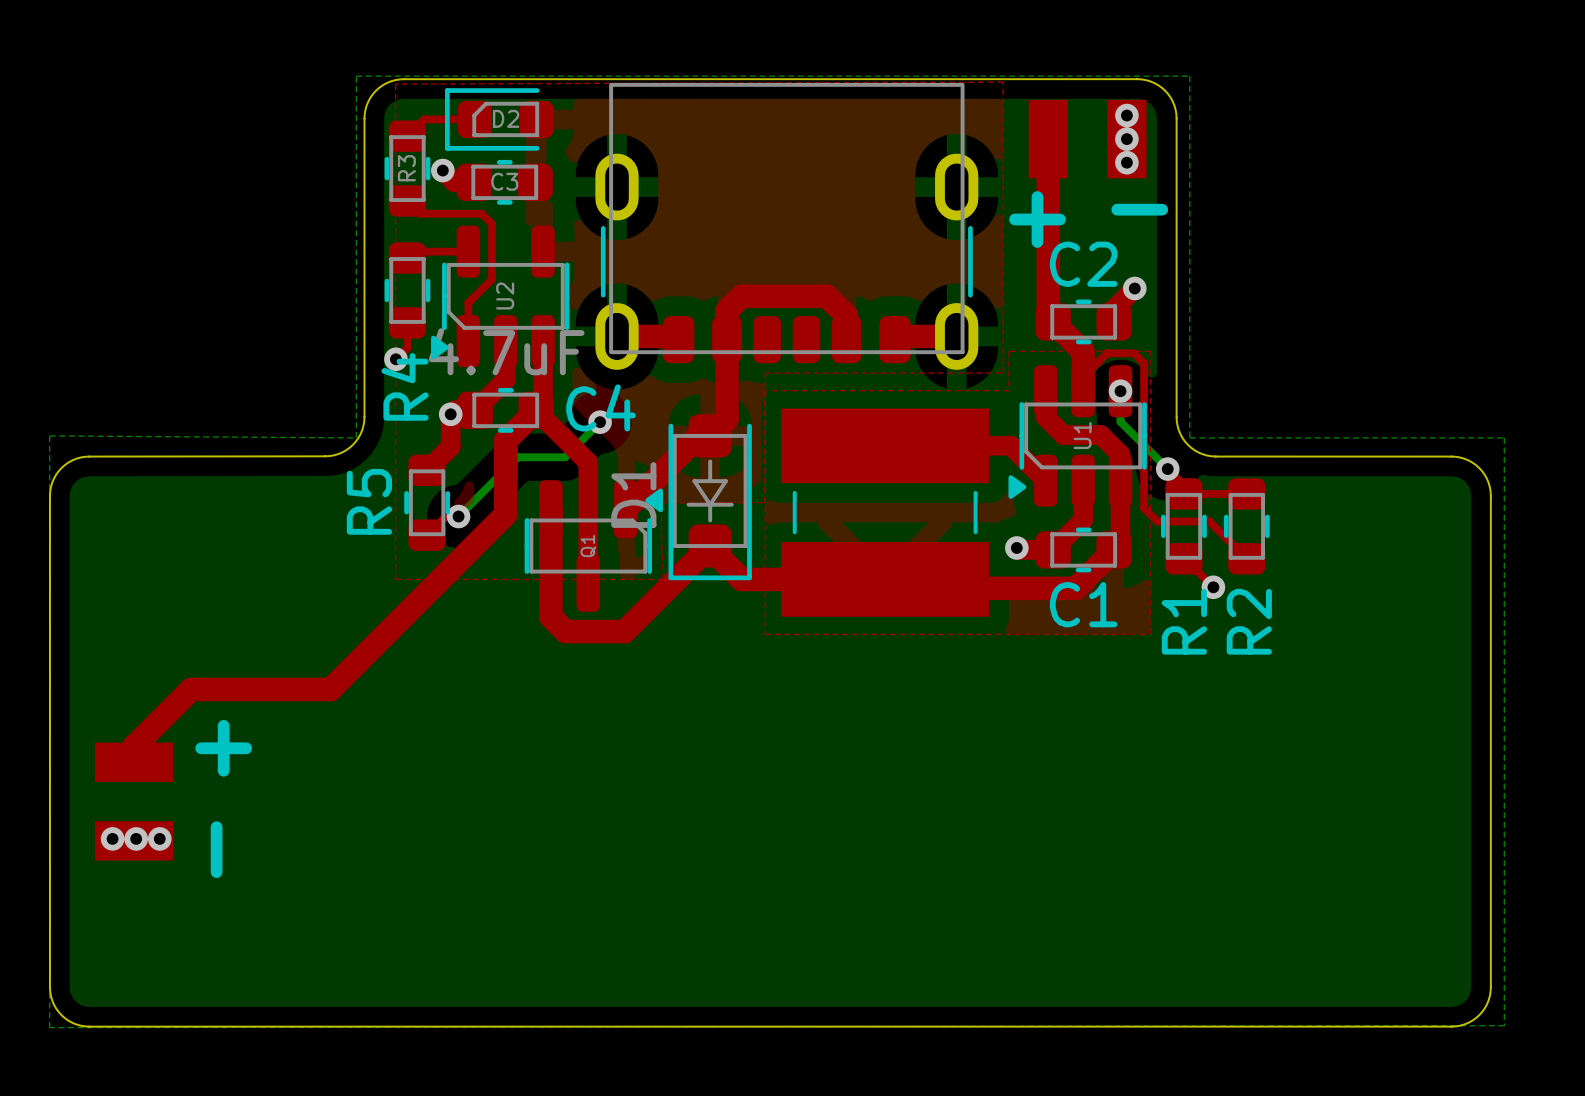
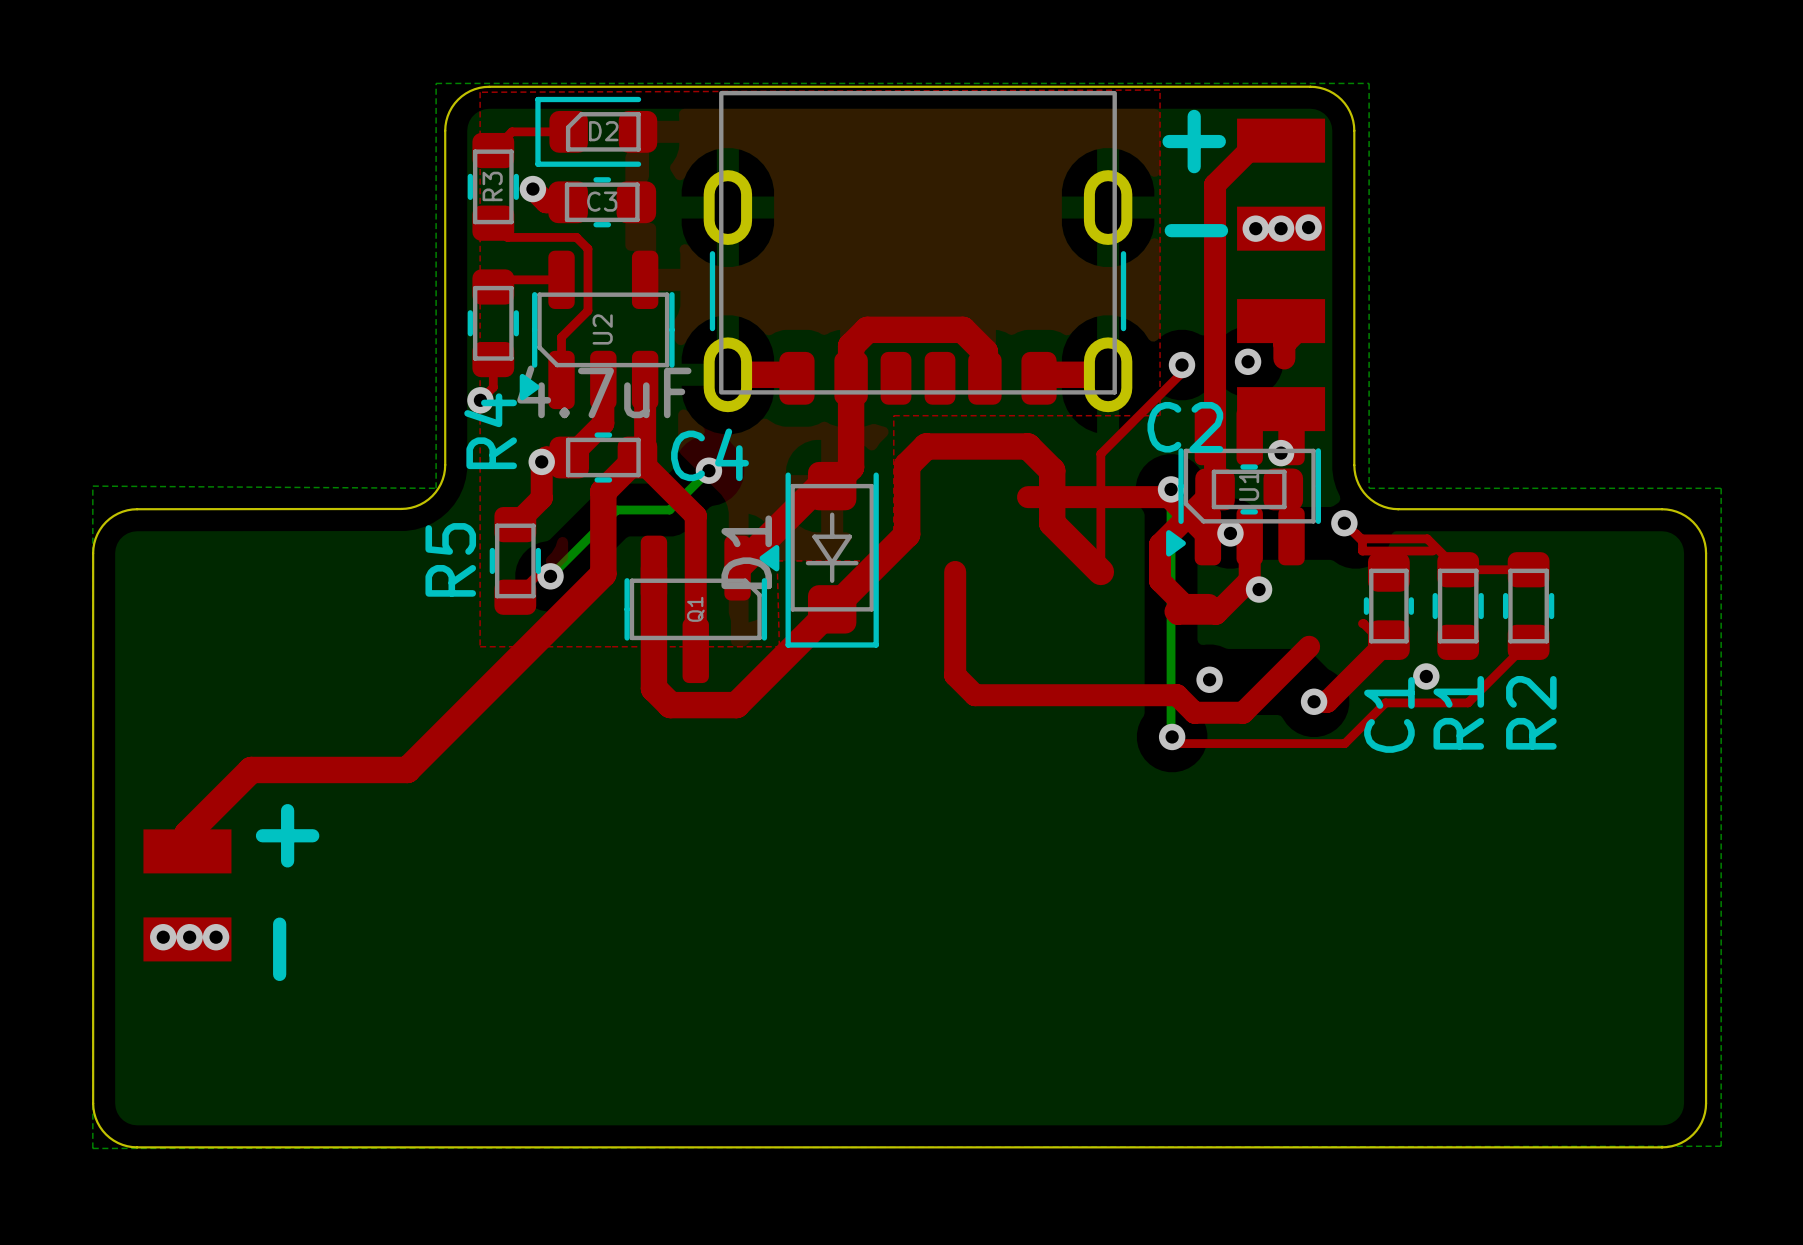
via: (1126, 115) -> none
top track: none -> (1281, 140) (1259, 140) (1215, 184) (1215, 489) (1160, 544) (1160, 580) (1184, 604) (1209, 604)
top track: (1048, 139) (1048, 317) (1083, 351) (1083, 391) -> none
part rotation: 0° (1087, 139) -> 90° clockwise (1281, 184)
via: (1126, 139) -> none
via: (1126, 162) -> none
via: none -> (1308, 227)
via: none -> (1255, 228)
via: none -> (1281, 228)
text position: - (1139, 209) -> - (1196, 230)
text position: + (1037, 219) -> + (1194, 141)
C2 name position: C2 (1083, 264) -> C2 (1185, 427)
via: (1134, 288) -> none
C2 position: (1083, 321) -> (1249, 489)
via: none -> (1248, 361)
top track: none -> (1182, 365) (1182, 372) (1100, 453) (1100, 571) (1052, 523) (1052, 470) (1027, 446) (926, 446) (907, 465) (907, 534) (832, 609)
via: none -> (1182, 365)
part: none -> (1281, 365)
top zone outline: (765, 390) (1008, 390) (1008, 351) (1150, 351) (1150, 634) (765, 634) (765, 502) -> none
top track: (1045, 391) (1045, 417) (1063, 434) (1100, 434) (1120, 454) (1120, 543) (1075, 588) (894, 588) (885, 579) (741, 579) (710, 547) -> none
bottom track: (1120, 391) (1120, 421) (1167, 469) -> none
via position: (1120, 391) -> (1281, 453)
top track: (1083, 409) (1083, 377) (1107, 353) (1133, 353) (1144, 363) (1144, 508) (1157, 521) (1209, 521) (1246, 558) -> none
bottom track: none -> (1171, 489) (1172, 736)
via: none -> (1171, 489)
via: none -> (1230, 533)
top track: none -> (1355, 533) (1361, 538) (1427, 538) (1458, 569) (1528, 569)
top track: none -> (955, 571) (955, 675) (975, 695) (1177, 695) (1194, 712) (1243, 712) (1309, 646)
part: (885, 512) -> none
R1 position: (1183, 526) -> (1458, 606)
R2 position: (1246, 526) -> (1528, 606)
via: none -> (1259, 589)
via: (1016, 547) -> none
C1 rotation: 0° (1083, 549) -> 90° clockwise (1388, 606)
C1 position: (1083, 549) -> (1388, 606)
top track: none -> (1388, 640) (1327, 701) (1314, 701)
top track: none -> (1528, 642) (1468, 702) (1385, 702) (1344, 743) (1178, 743) (1172, 736)
via position: (1213, 587) -> (1426, 676)
via: none -> (1209, 679)
via: none -> (1314, 701)
via: none -> (1172, 736)

